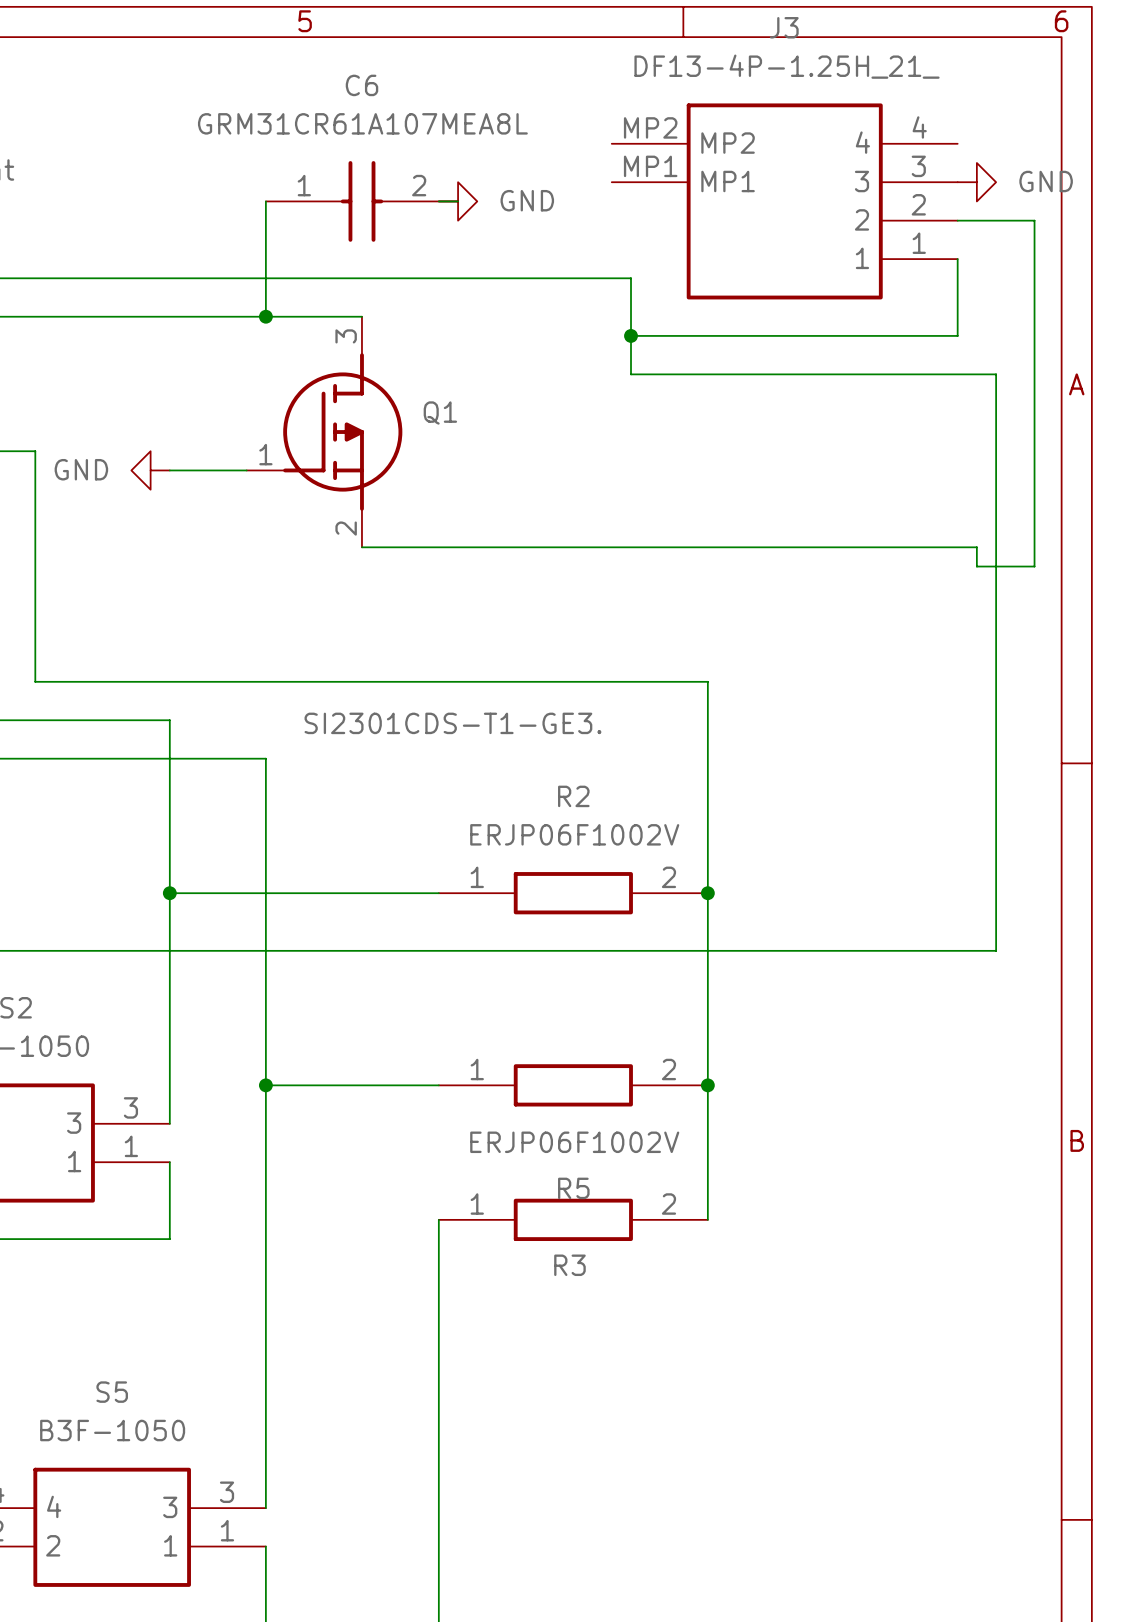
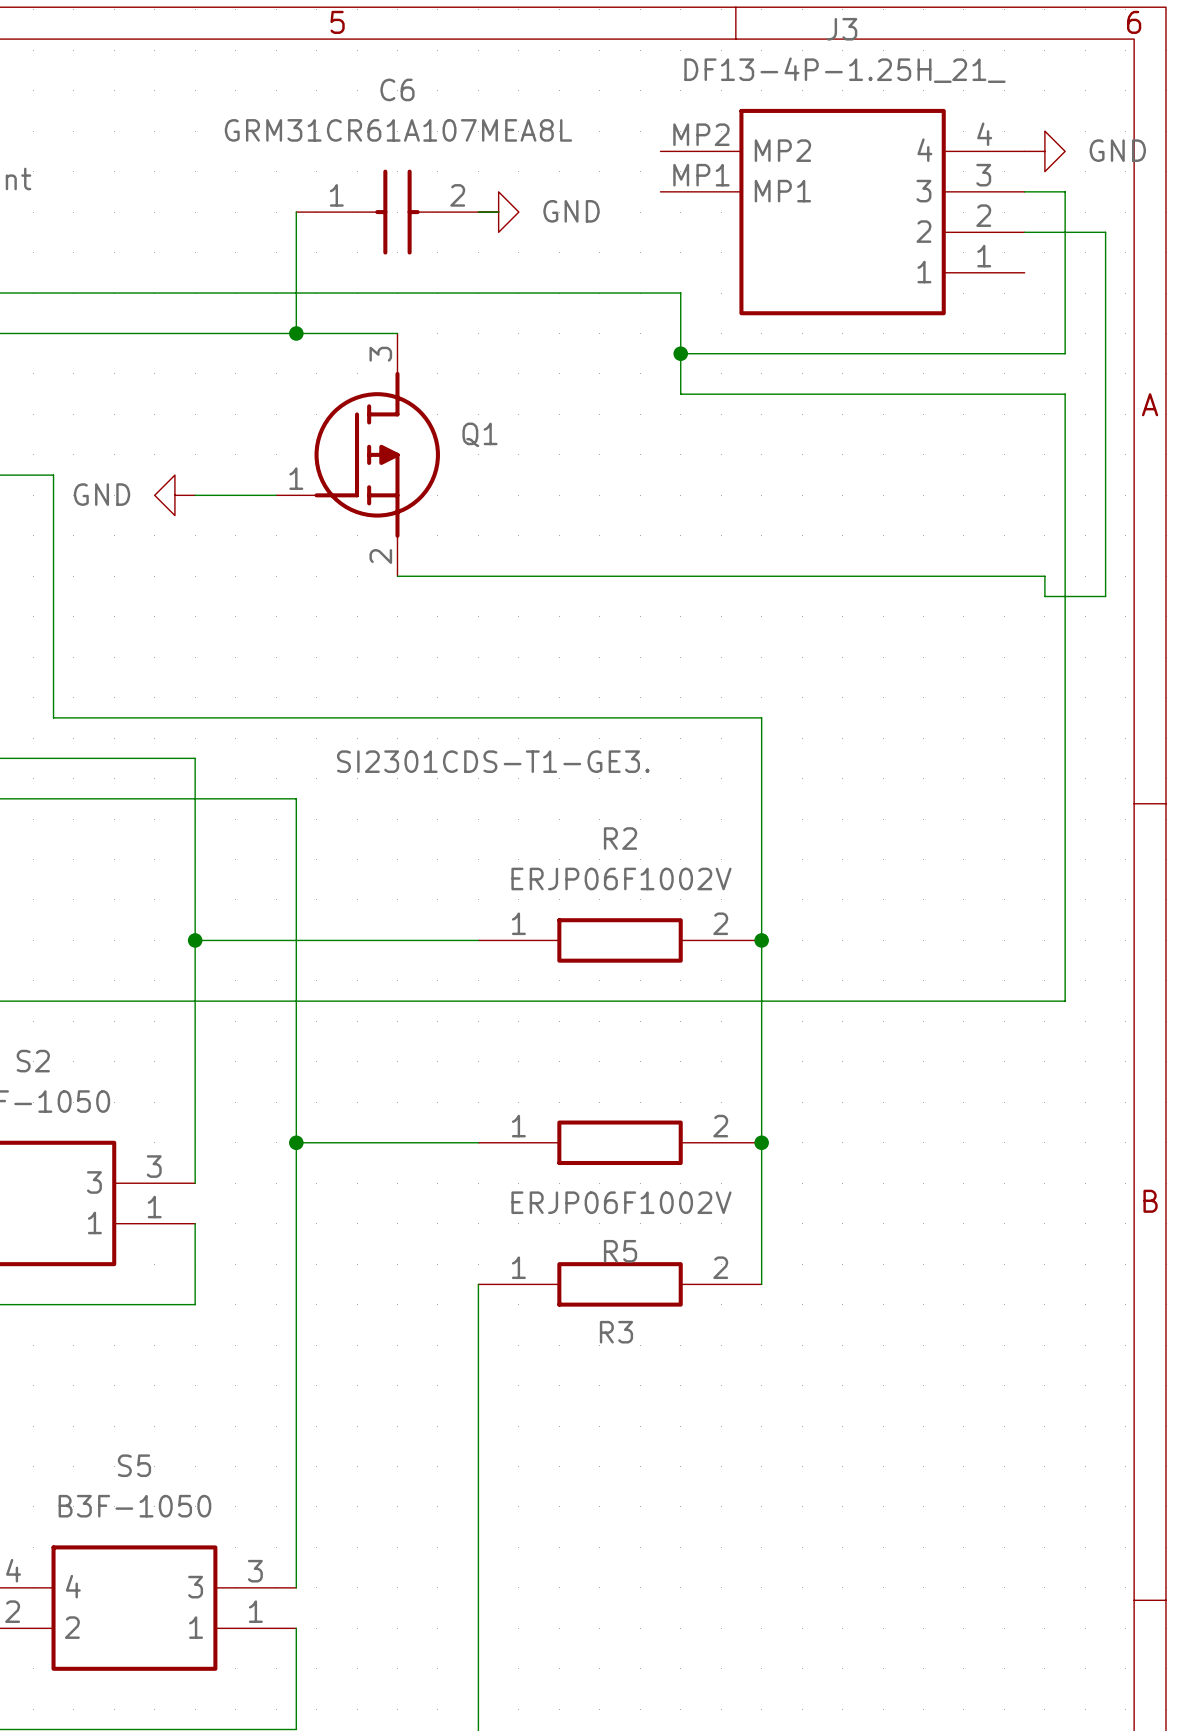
power symbol position: GND (976, 182) -> GND (1044, 151)
wire: (957, 259) (957, 335) -> (1024, 191) (1065, 191) (1065, 353) (1024, 353)

